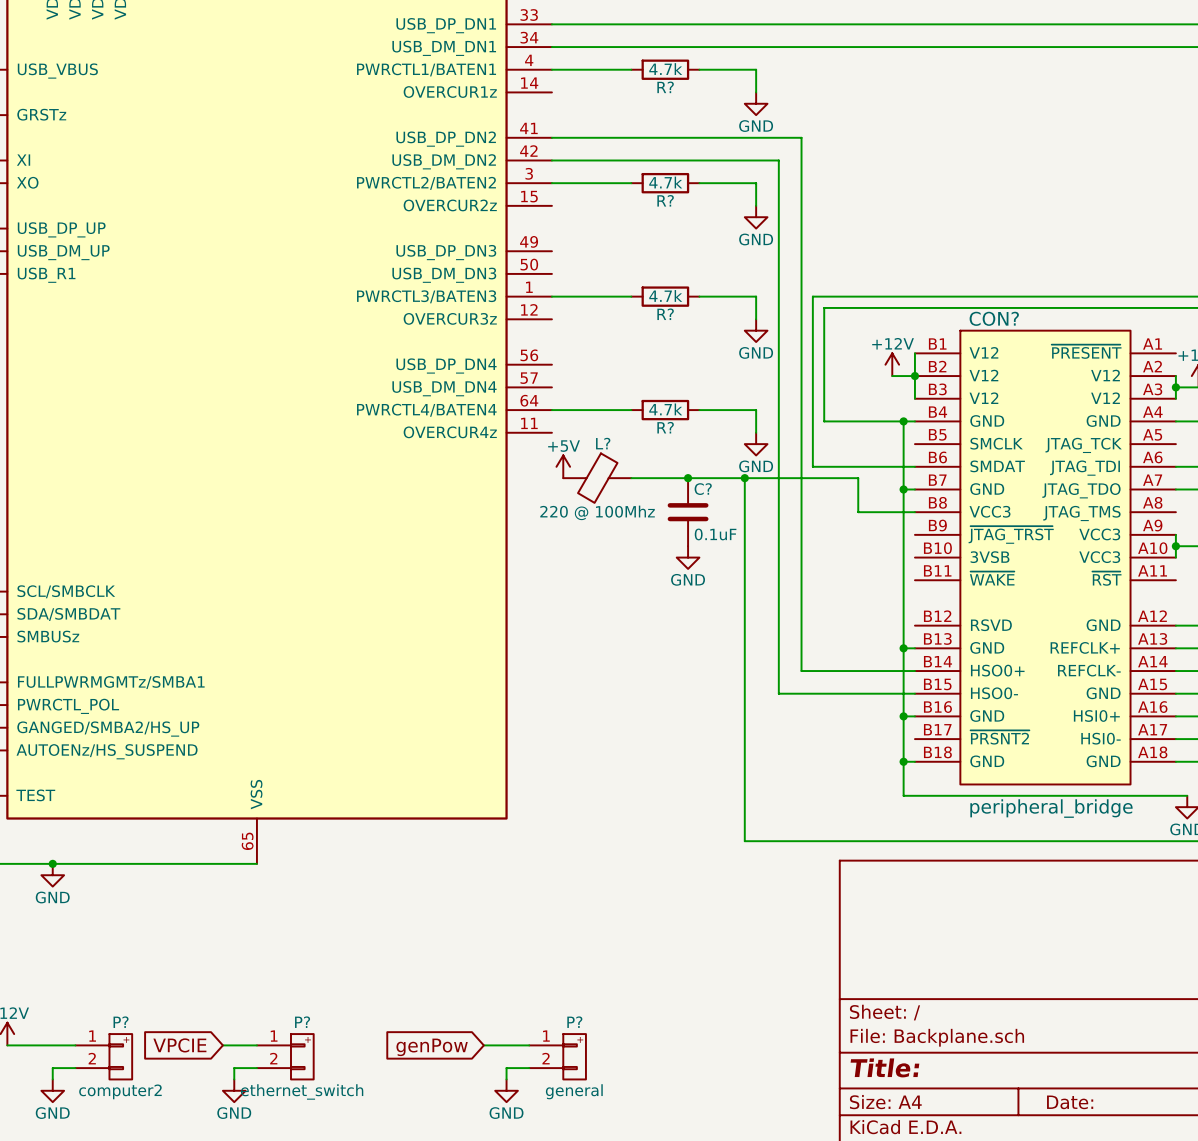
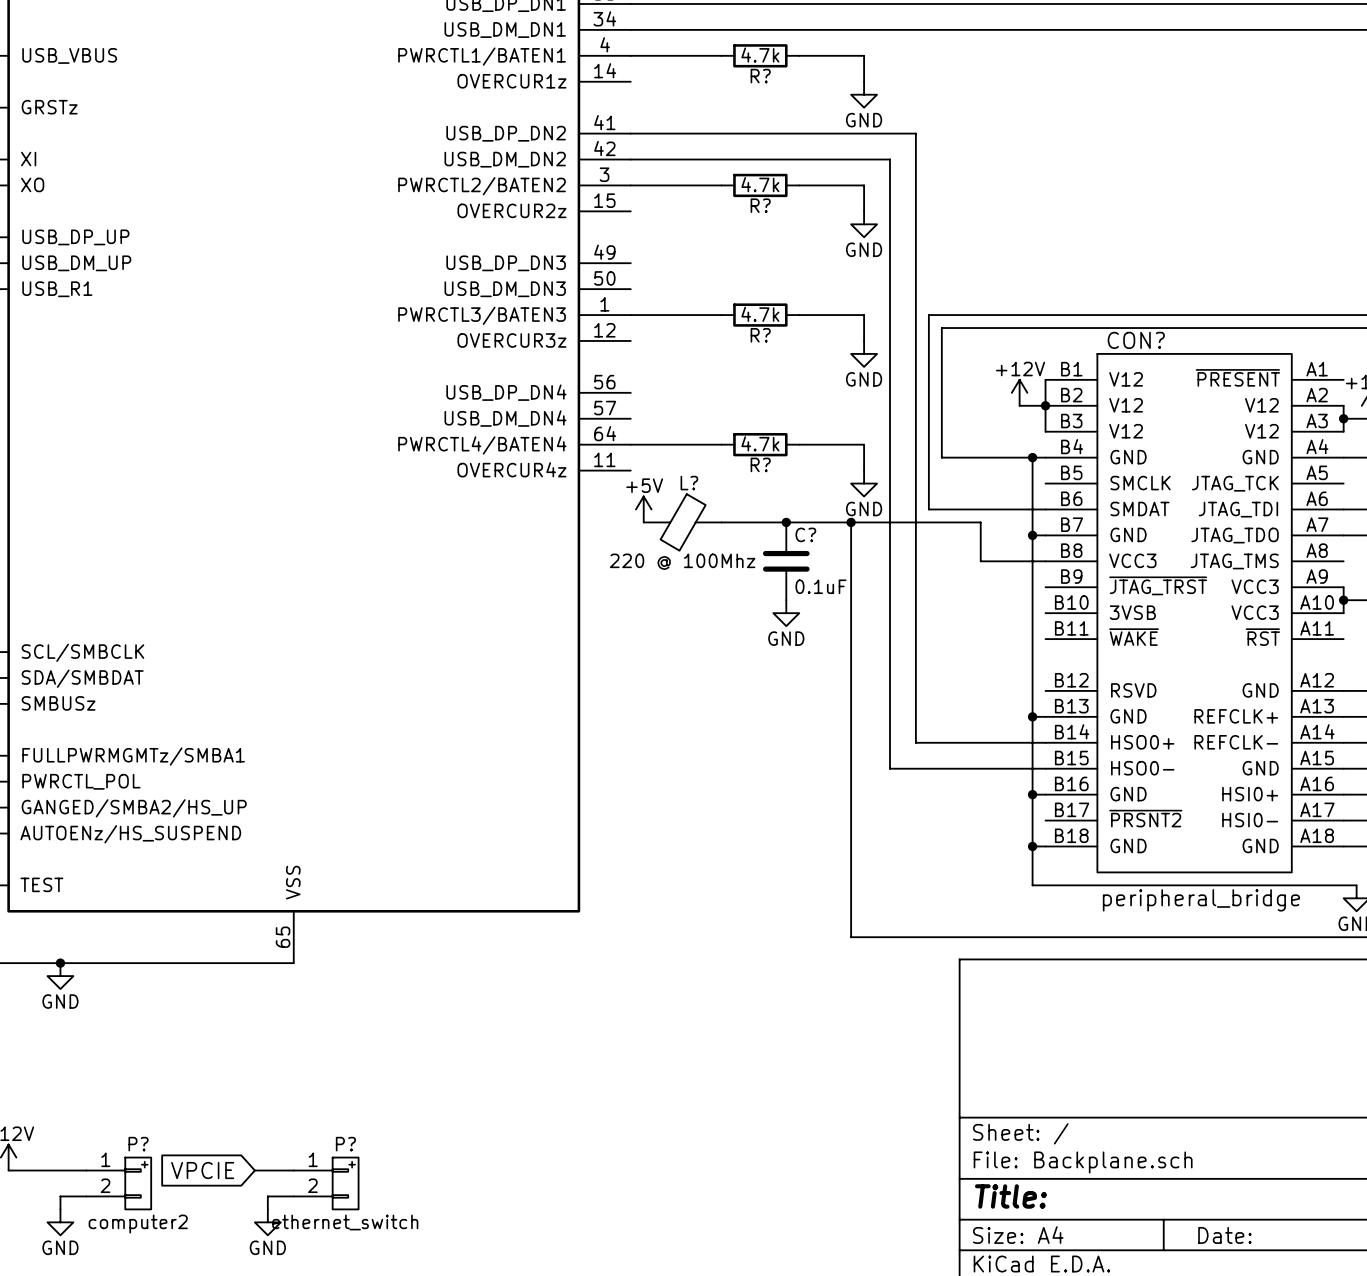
wire: (483, 1045) (529, 1045) -> none
global label: genPow (432, 1047) -> none
P?: general (557, 1056) -> none
wire: (529, 1068) (506, 1068) (506, 1079) -> none
power symbol: GND (506, 1090) -> none

